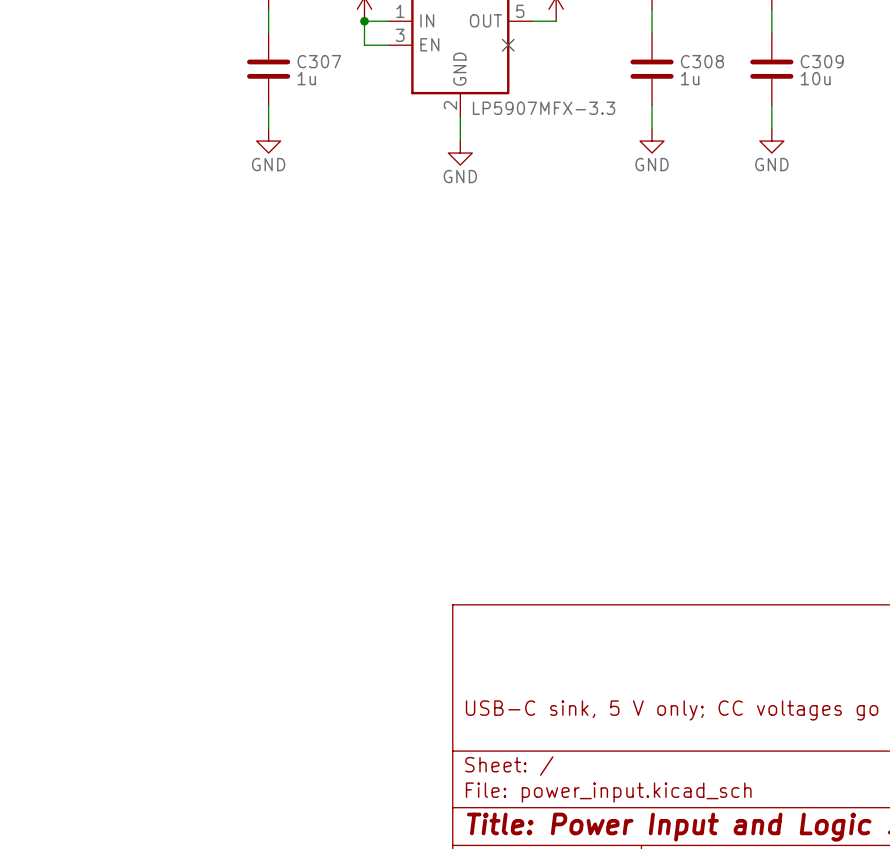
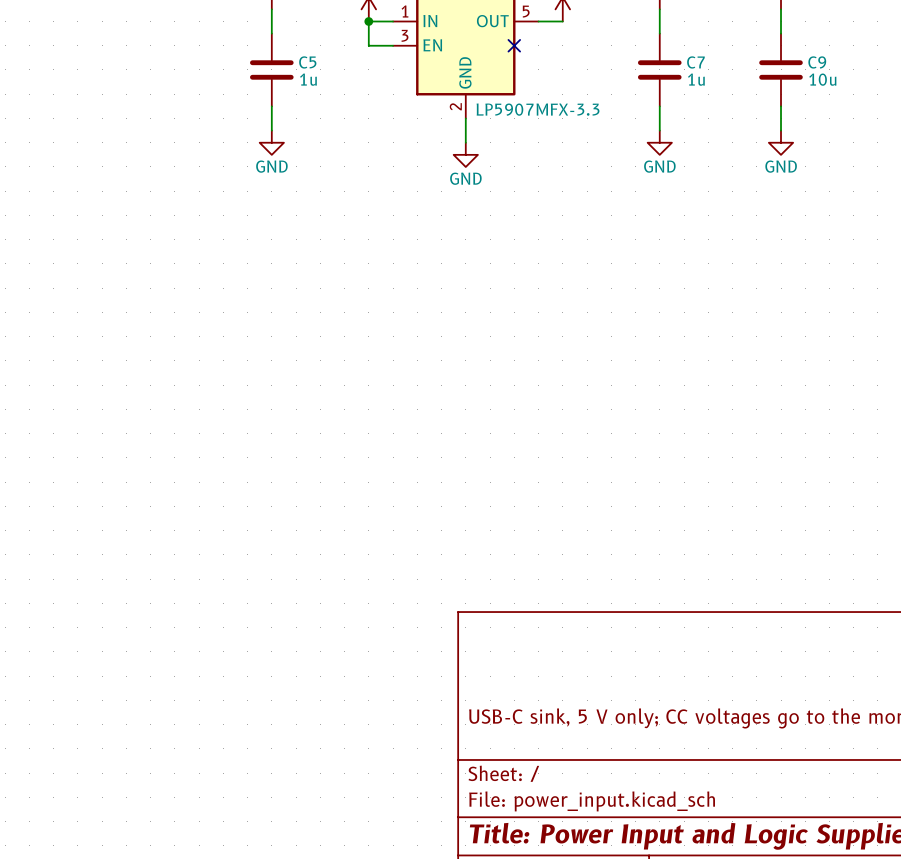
C307 name: C307 (319, 61) -> C5 (307, 62)
C308 name: C308 (702, 61) -> C7 (695, 62)
C309 name: C309 (822, 61) -> C9 (817, 62)

